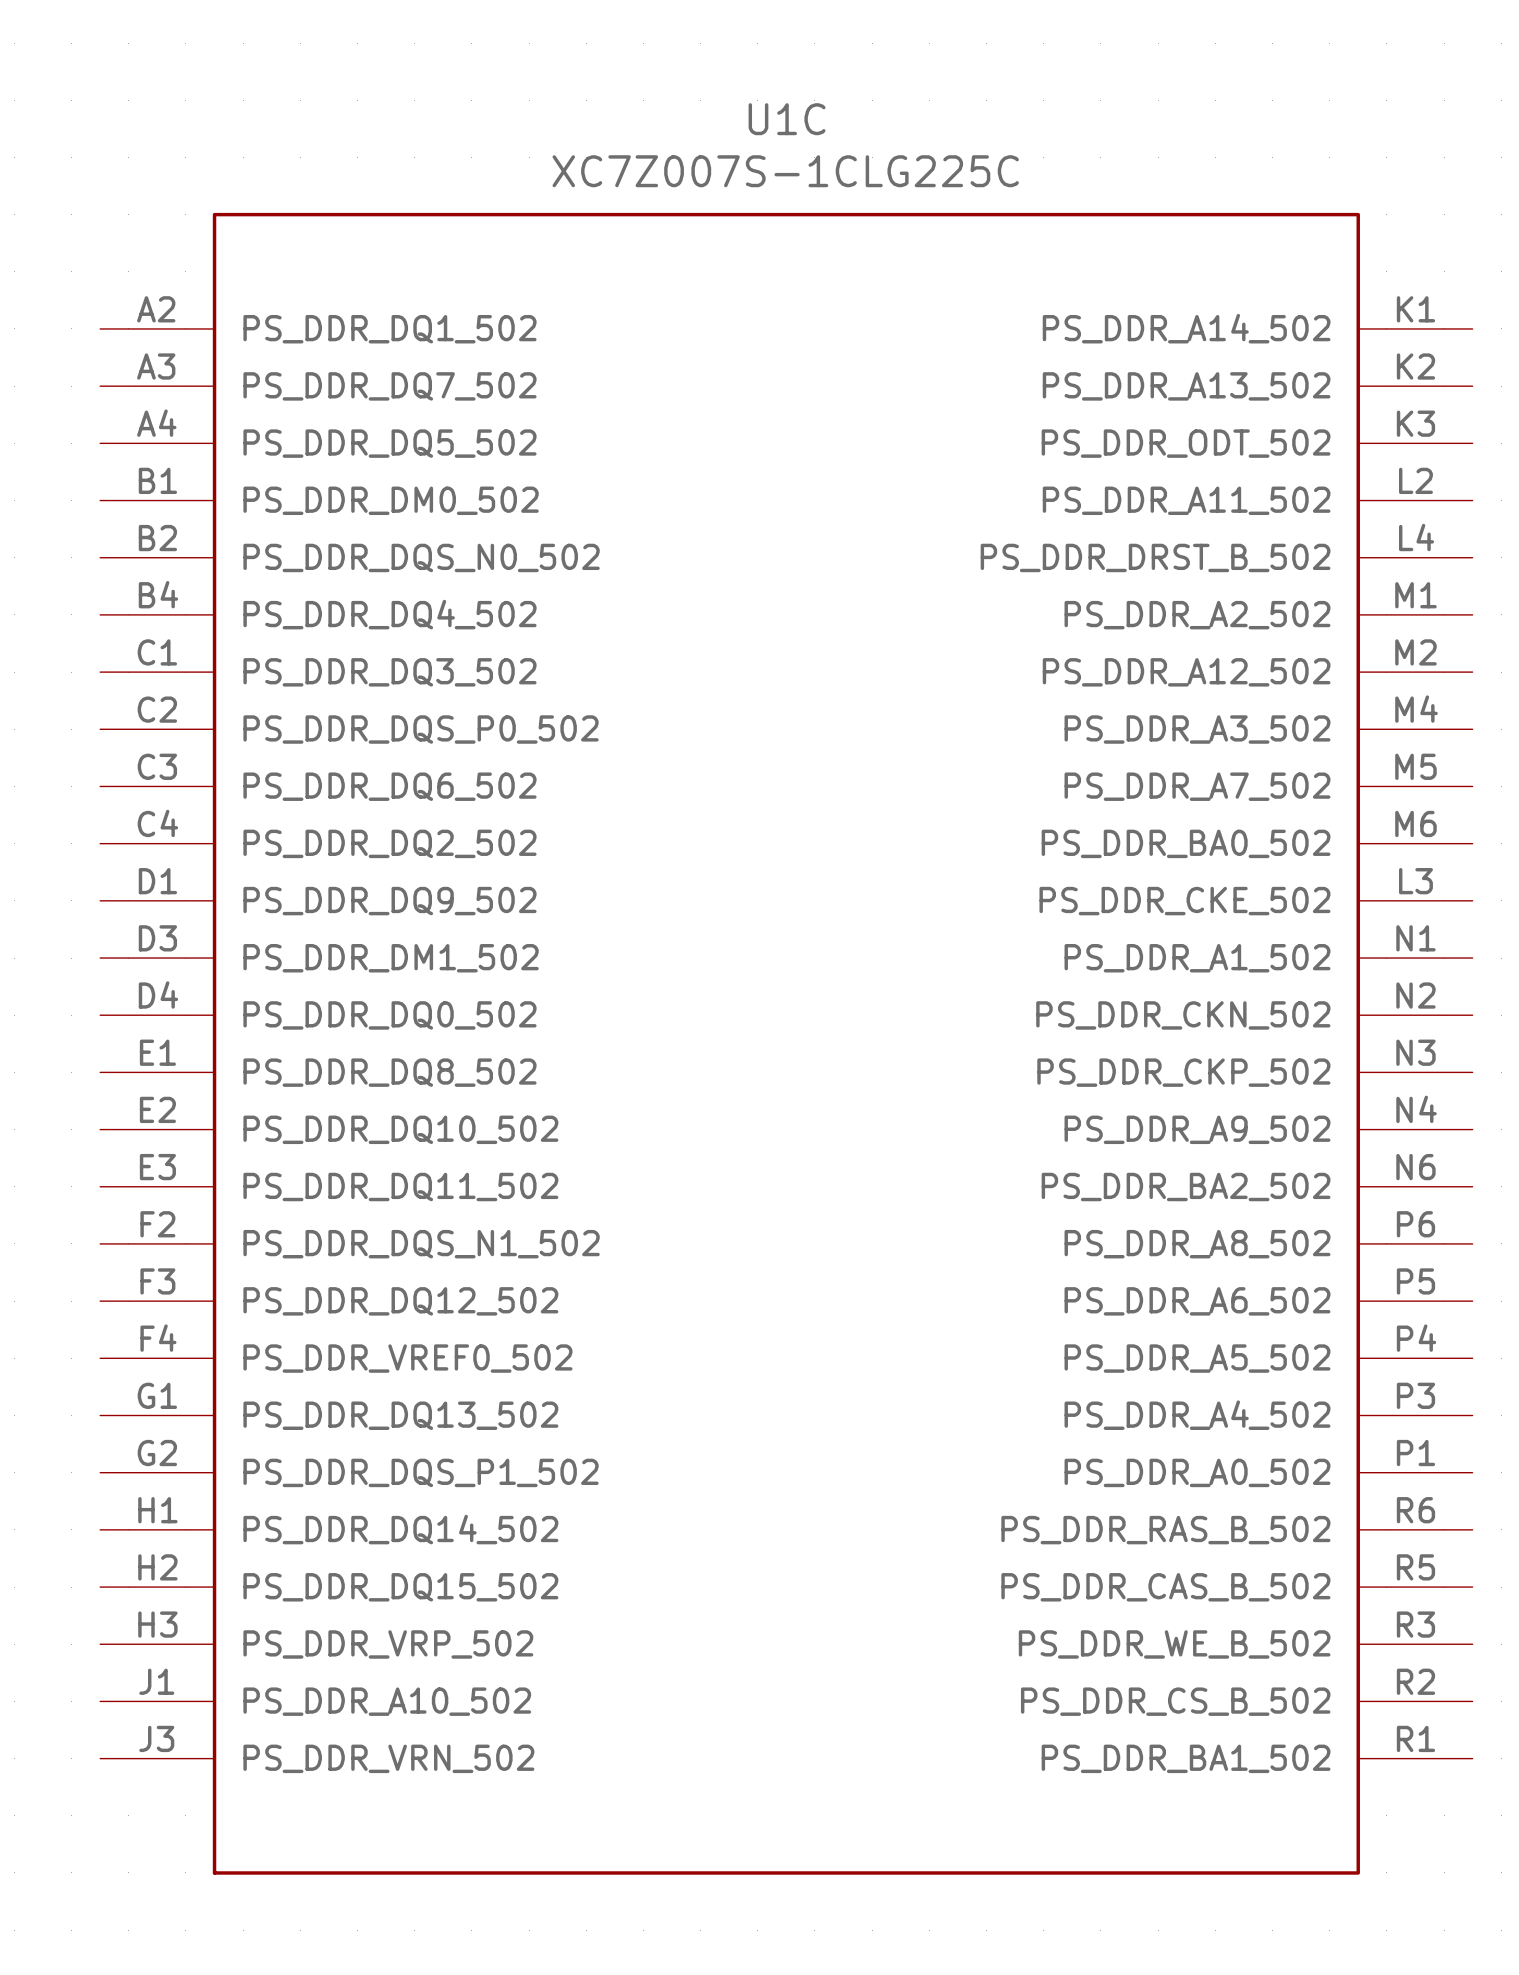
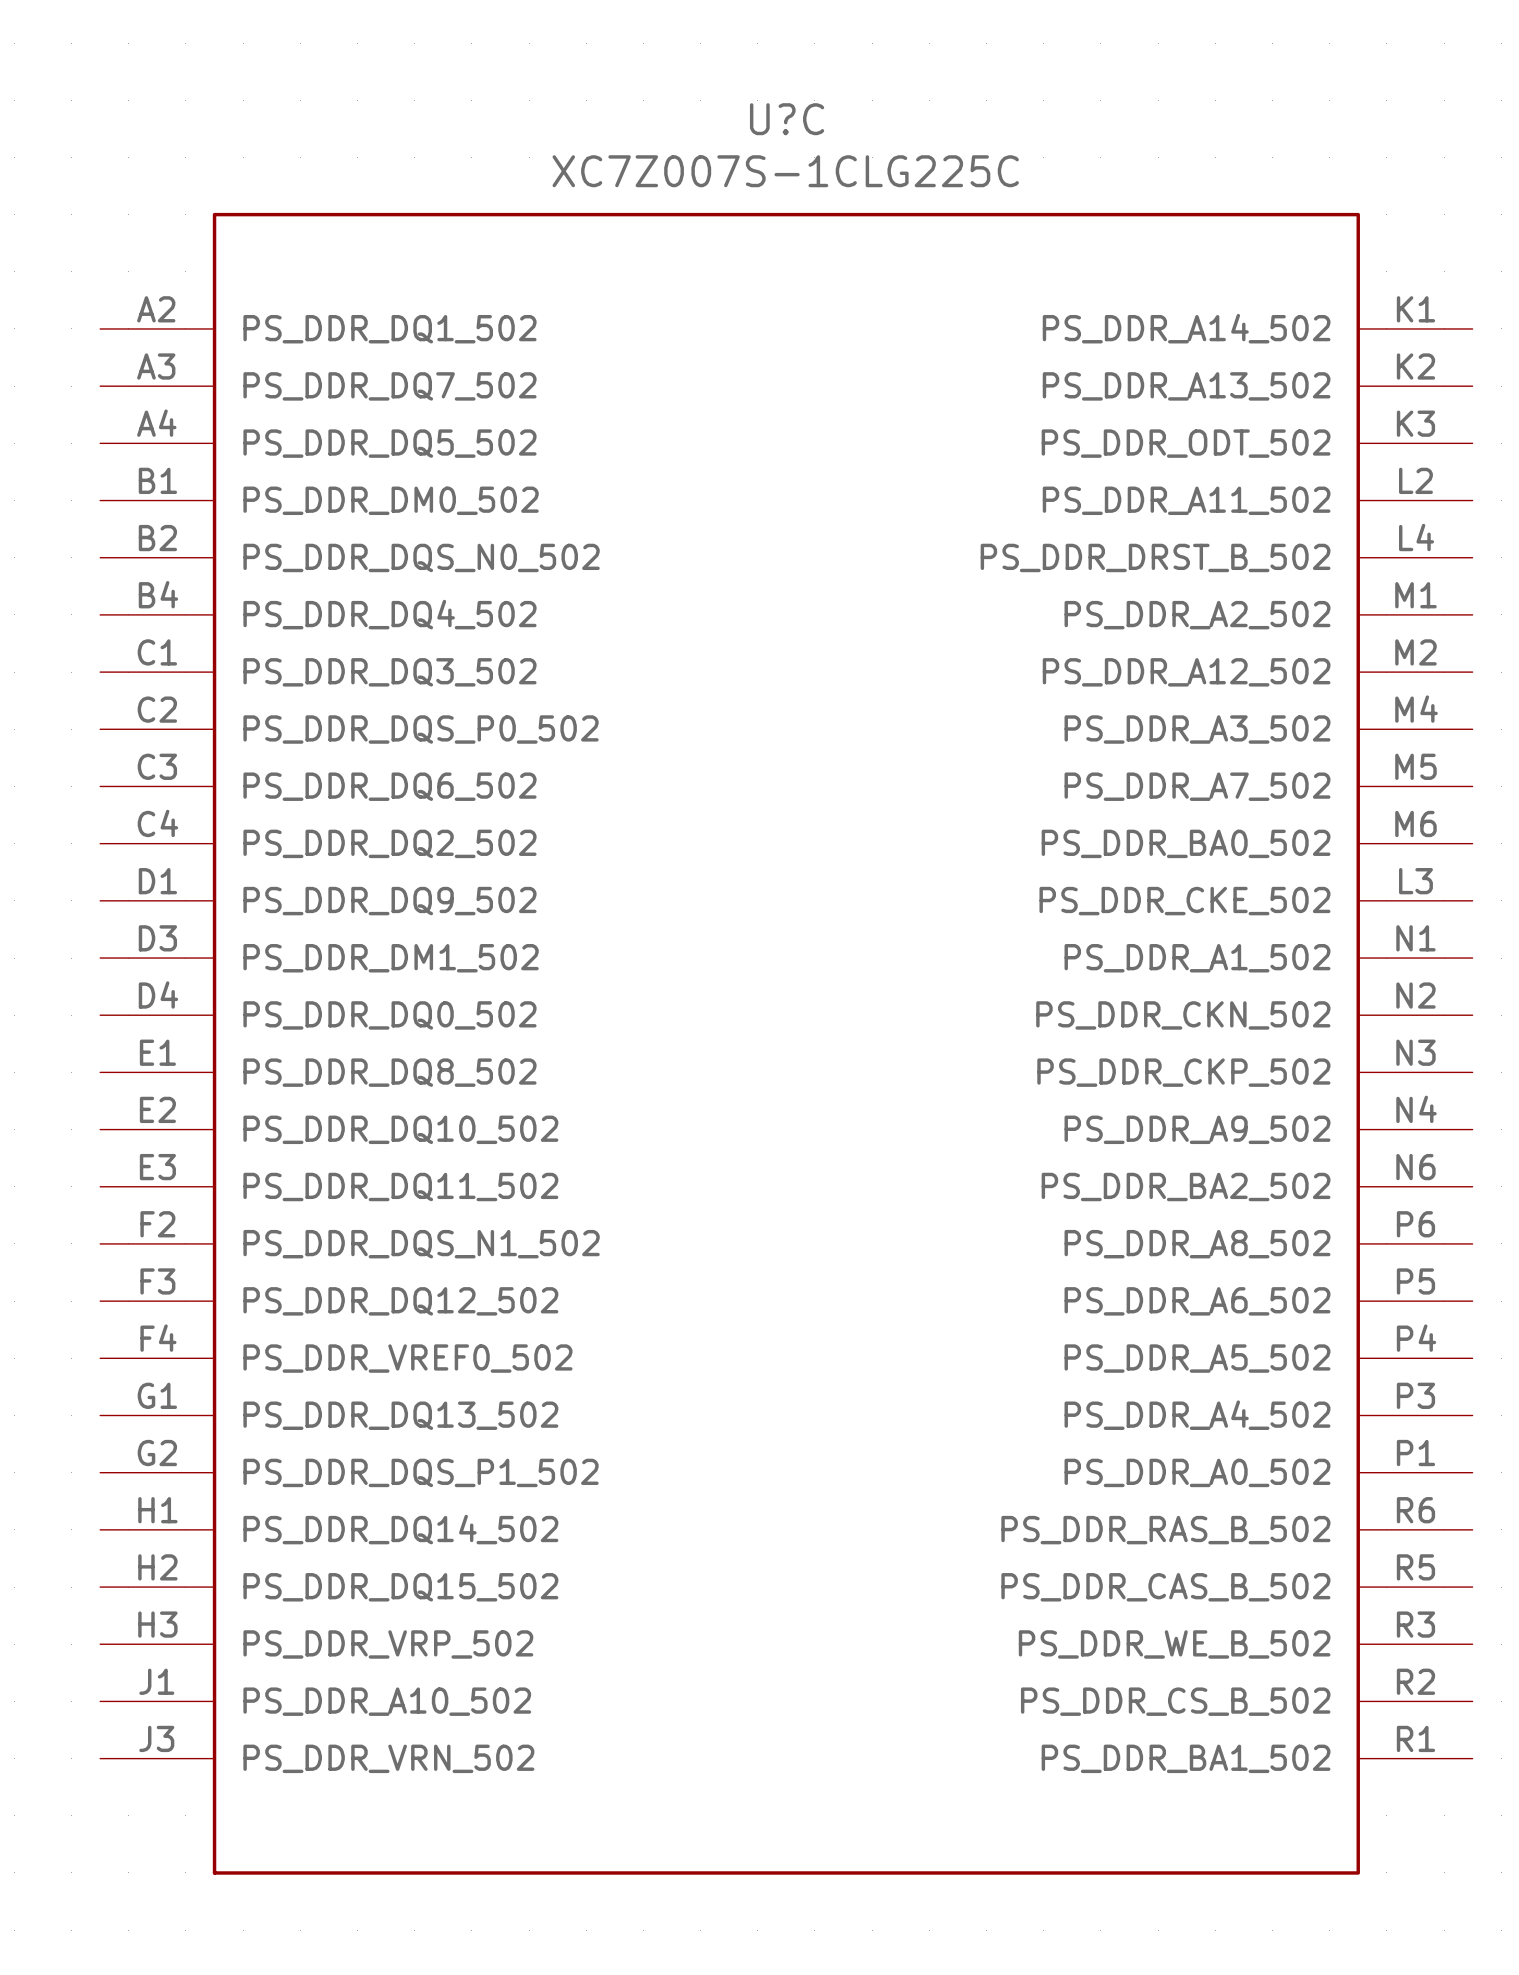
U1C name: U1C (787, 119) -> U?C (787, 119)

